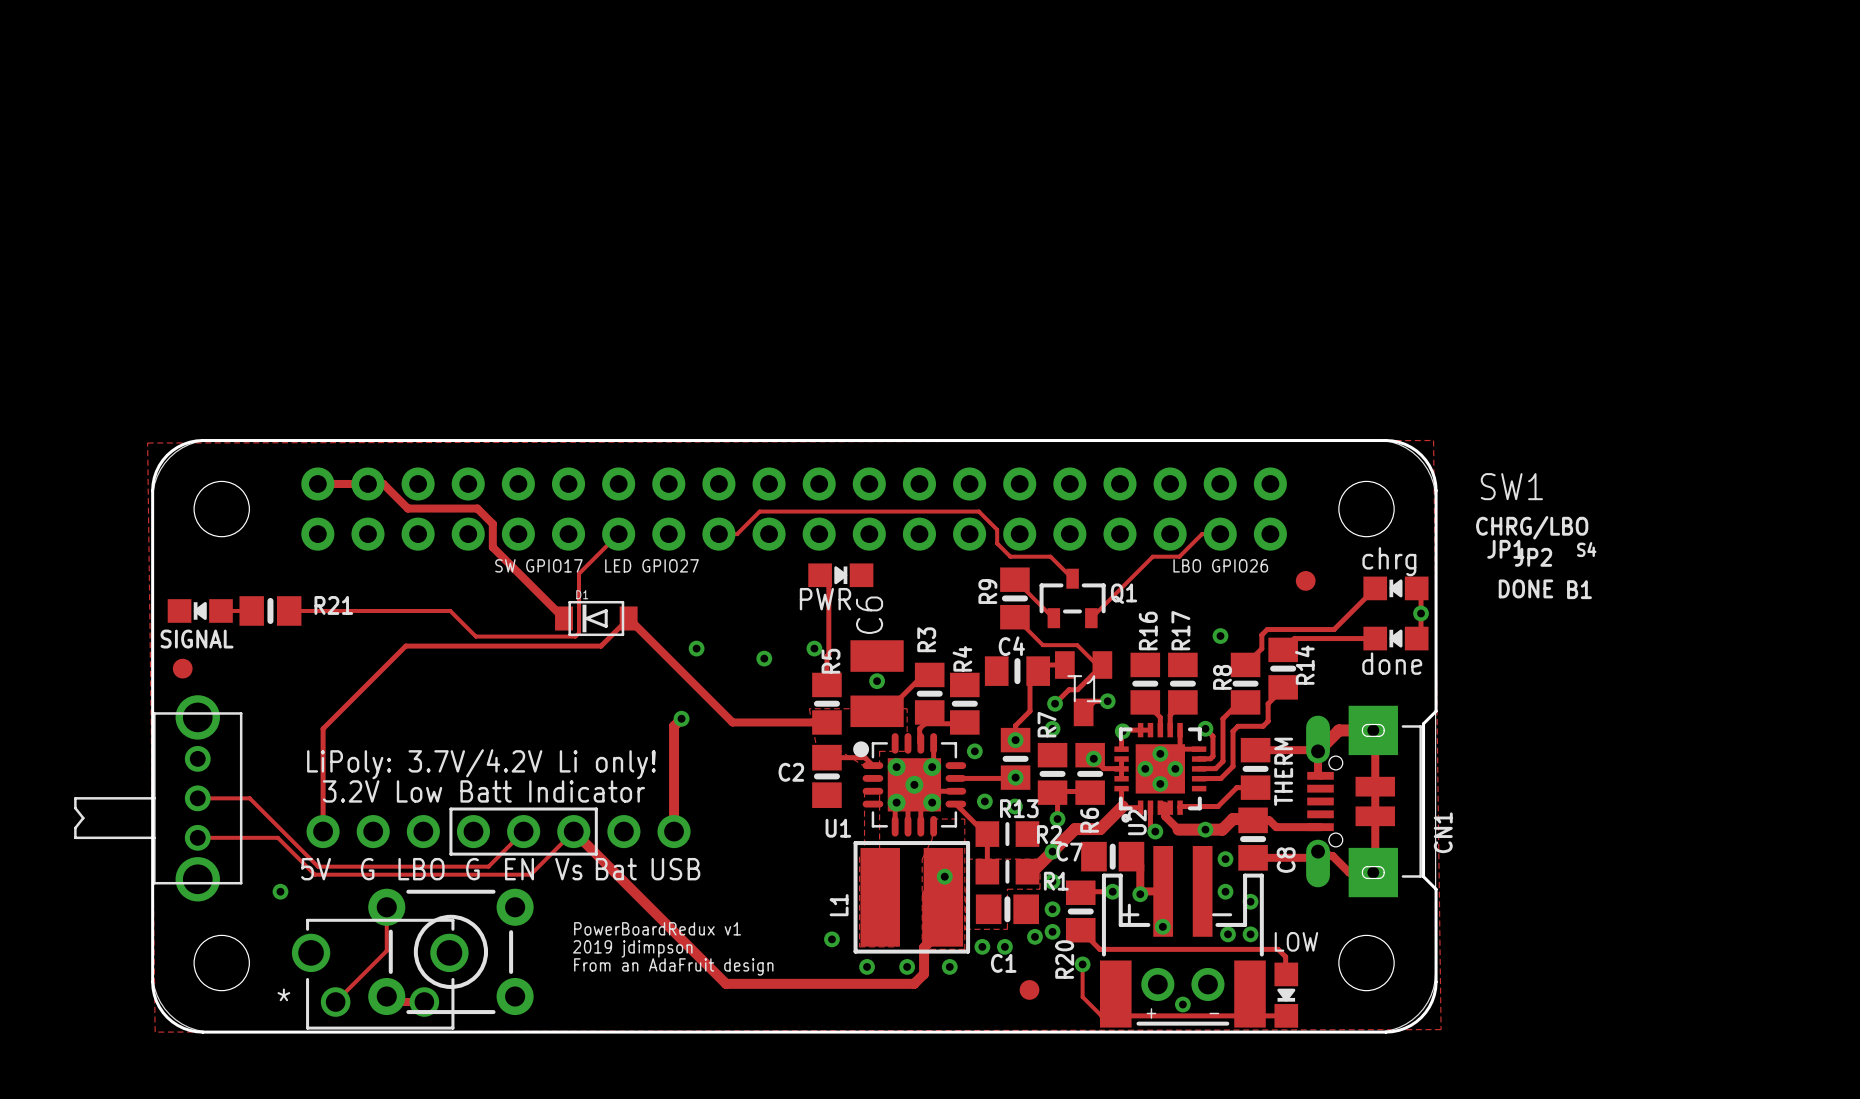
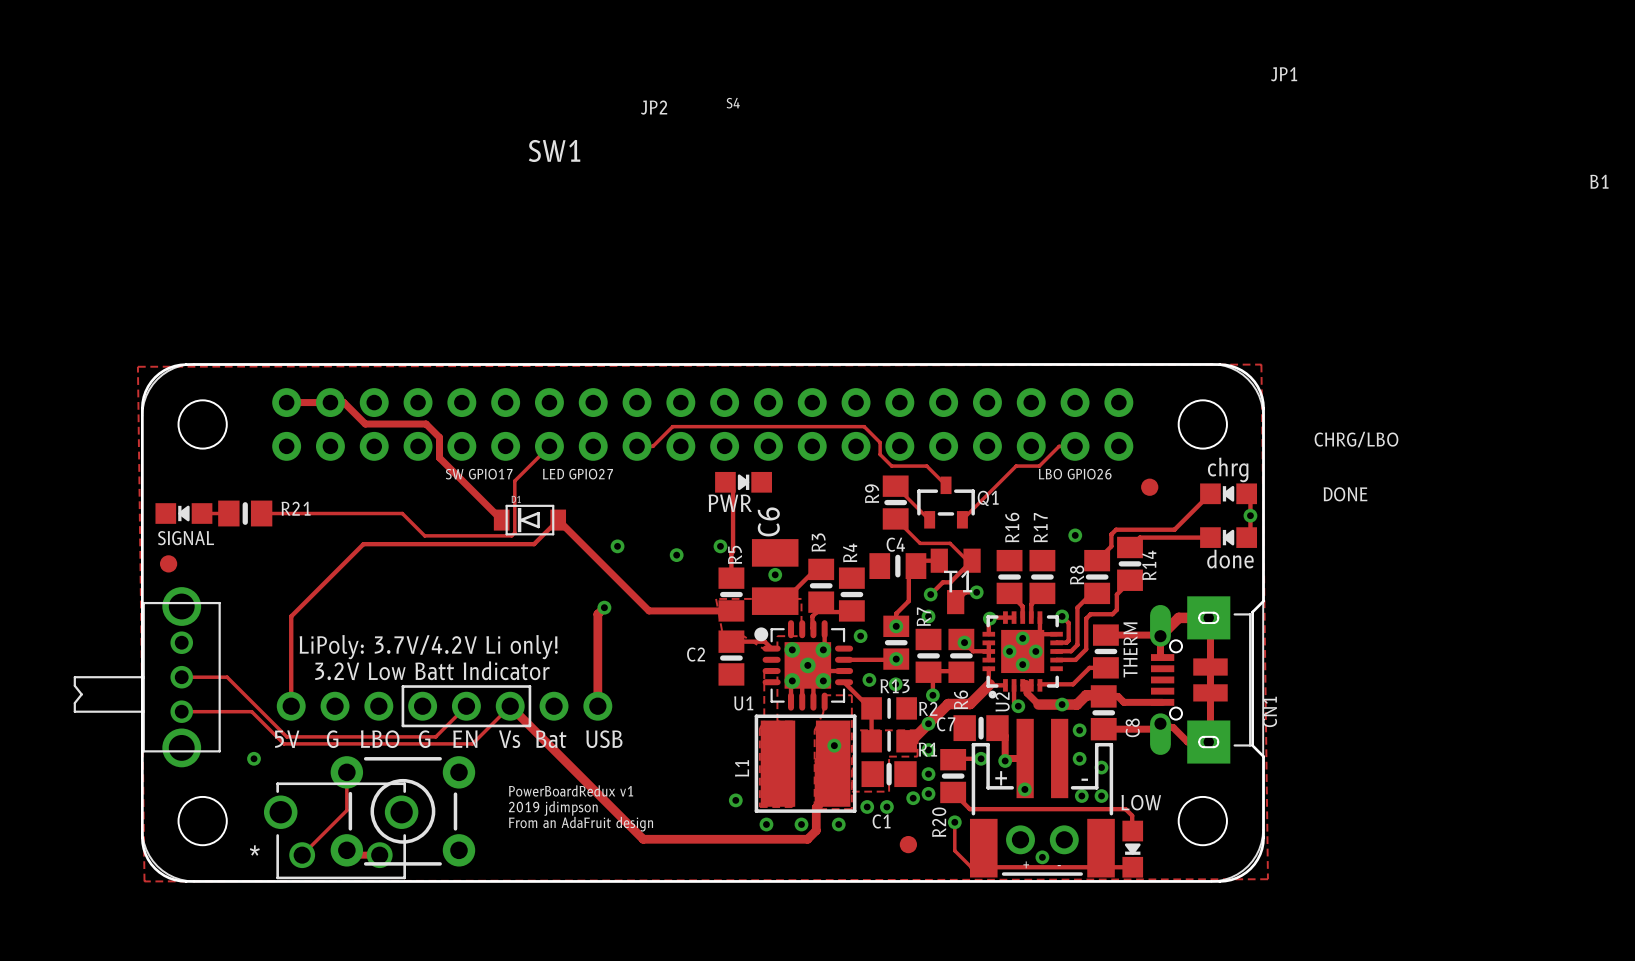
SW1 name position: SW1 (1511, 486) -> SW1 (554, 150)
JP1 name position: JP1 (1505, 549) -> JP1 (1284, 74)
S4 name position: S4 (1586, 549) -> S4 (733, 103)
JP2 name position: JP2 (1533, 557) -> JP2 (654, 107)
B1 name position: B1 (1579, 589) -> B1 (1599, 181)

